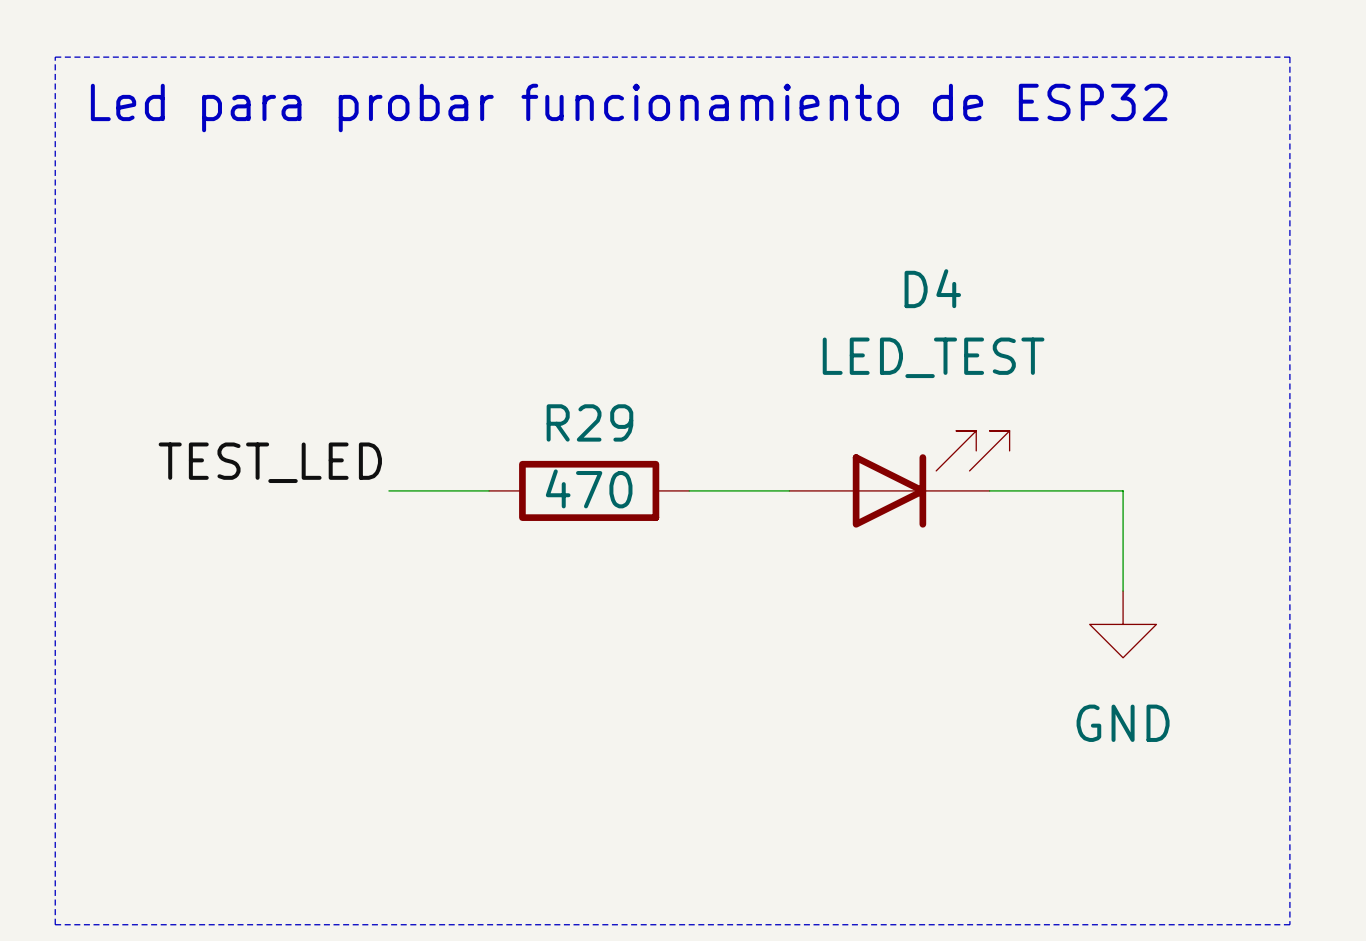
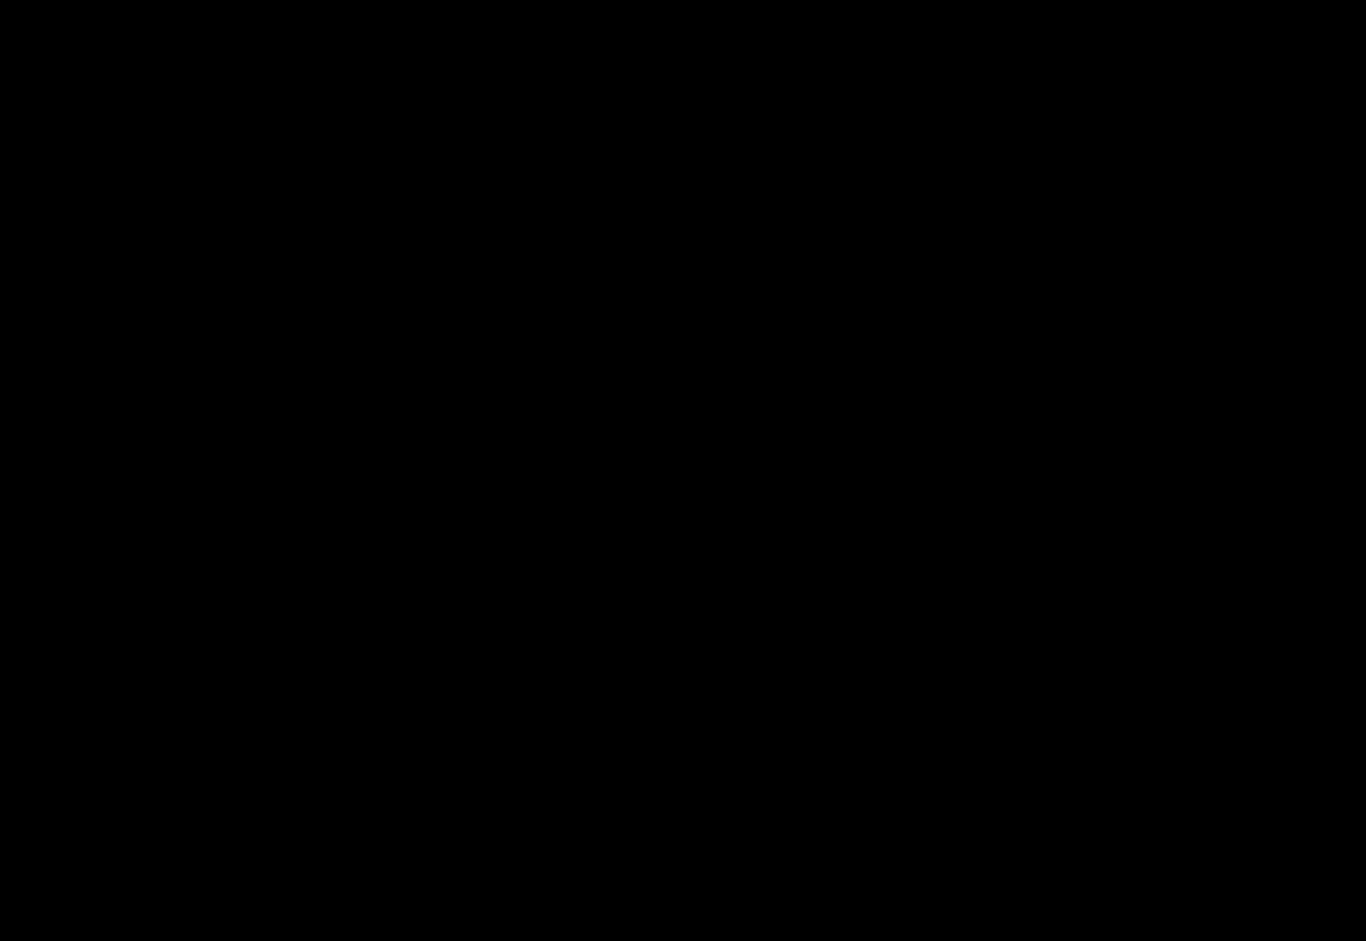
line: (55, 57) (1289, 57) (1289, 924) (55, 924) (55, 57) -> none
text: Led para probar funcionamiento de ESP32 (629, 107) -> none
label: TEST_LED (270, 462) -> none
D4: LED_TEST (899, 479) -> none
wire: (388, 490) (489, 490) -> none
R29: 470 (589, 490) -> none
wire: (689, 490) (789, 490) -> none
wire: (989, 490) (1123, 490) (1123, 591) -> none
power symbol: GND (1123, 624) -> none

